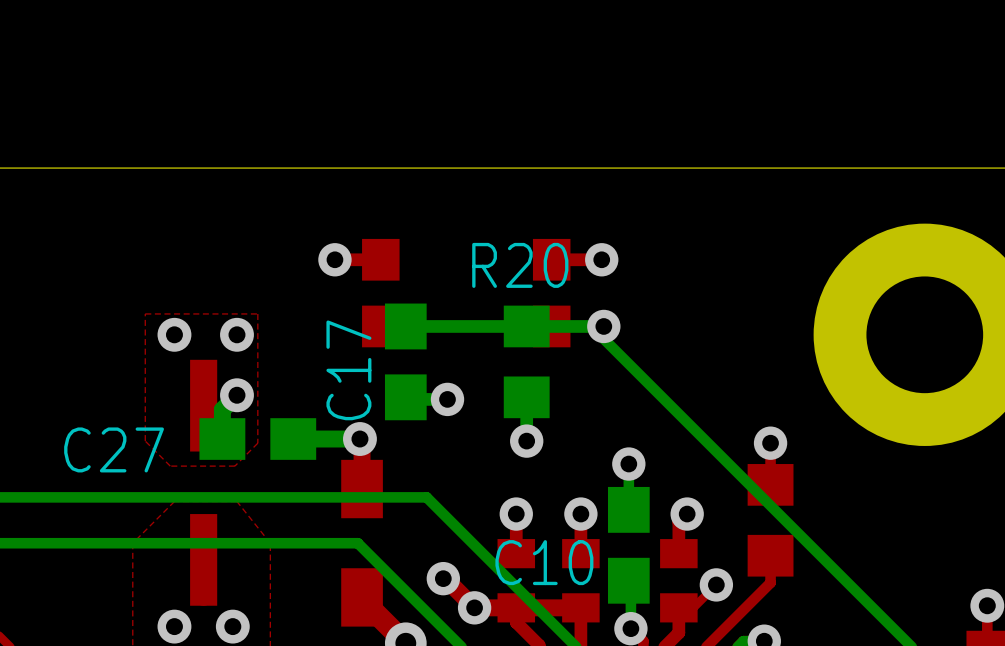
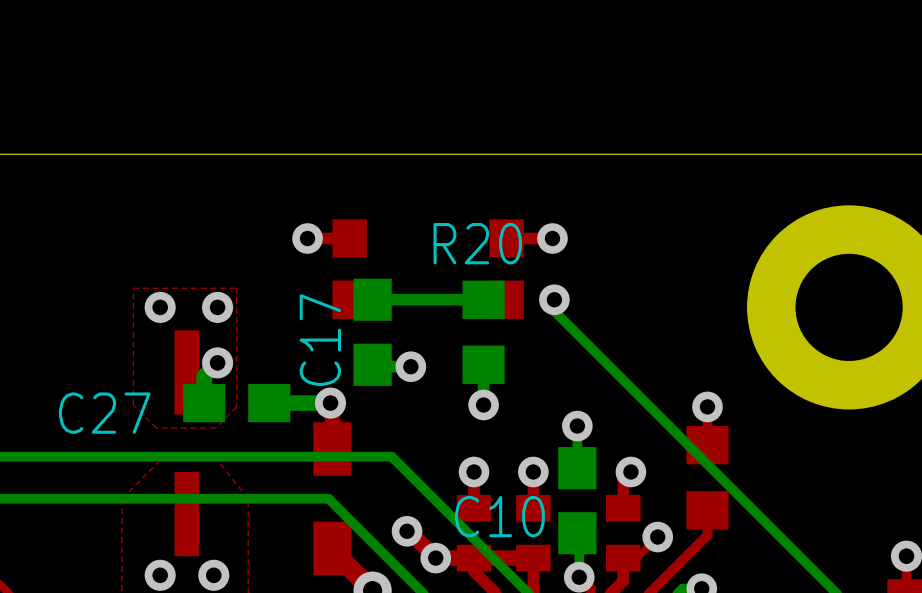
bottom track: (603, 326) (526, 326) -> none

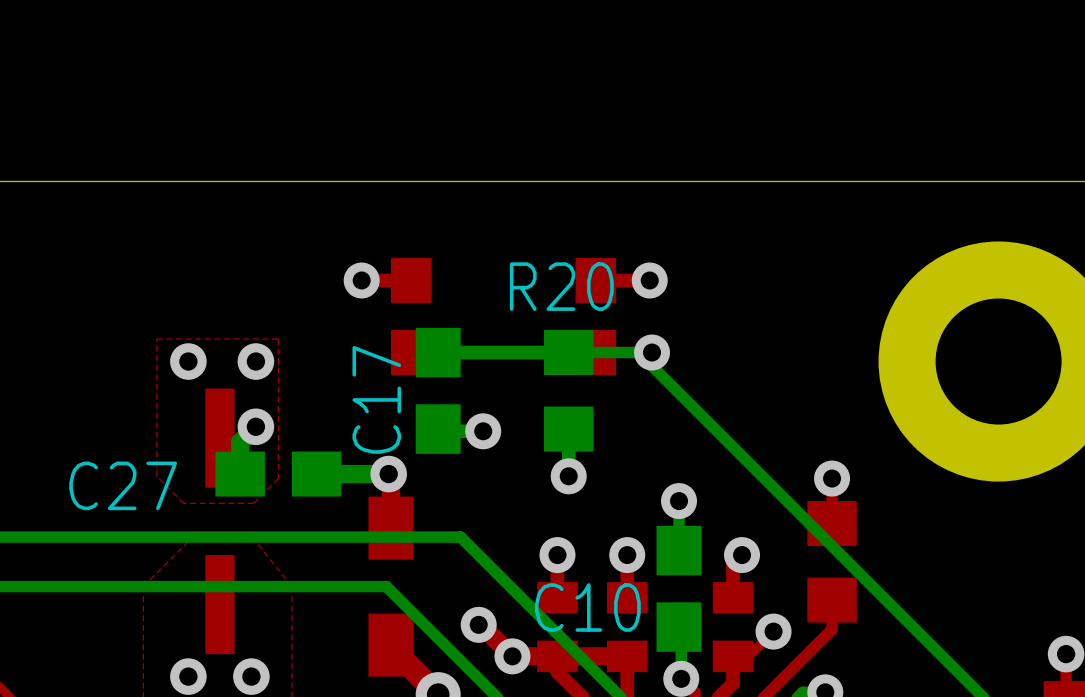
bottom track: none -> (652, 352) (568, 352)

